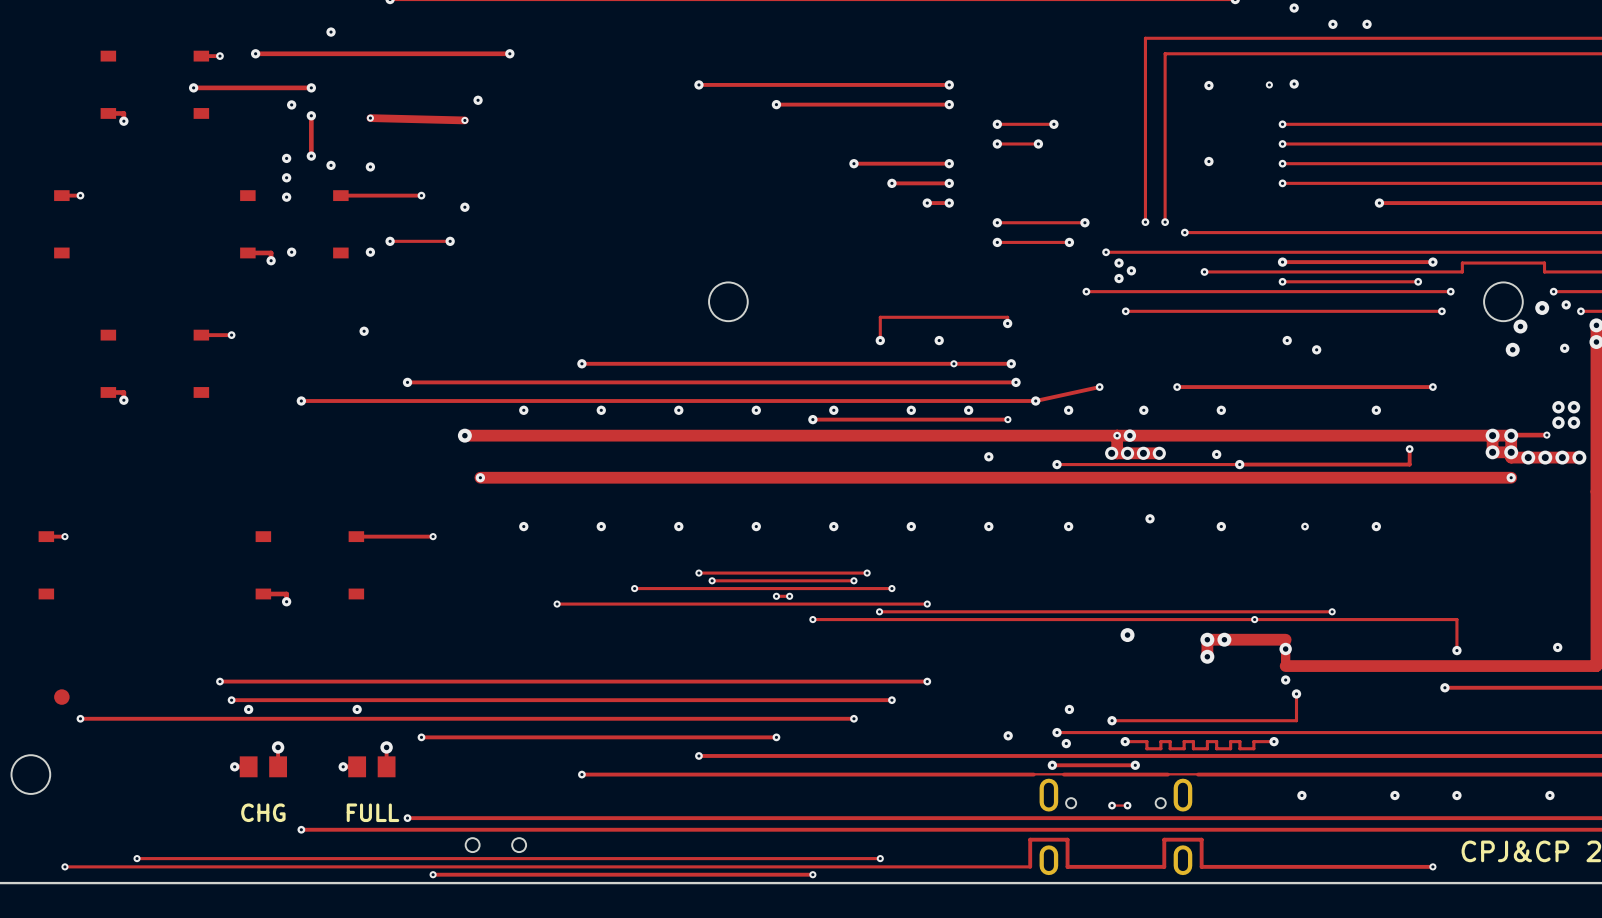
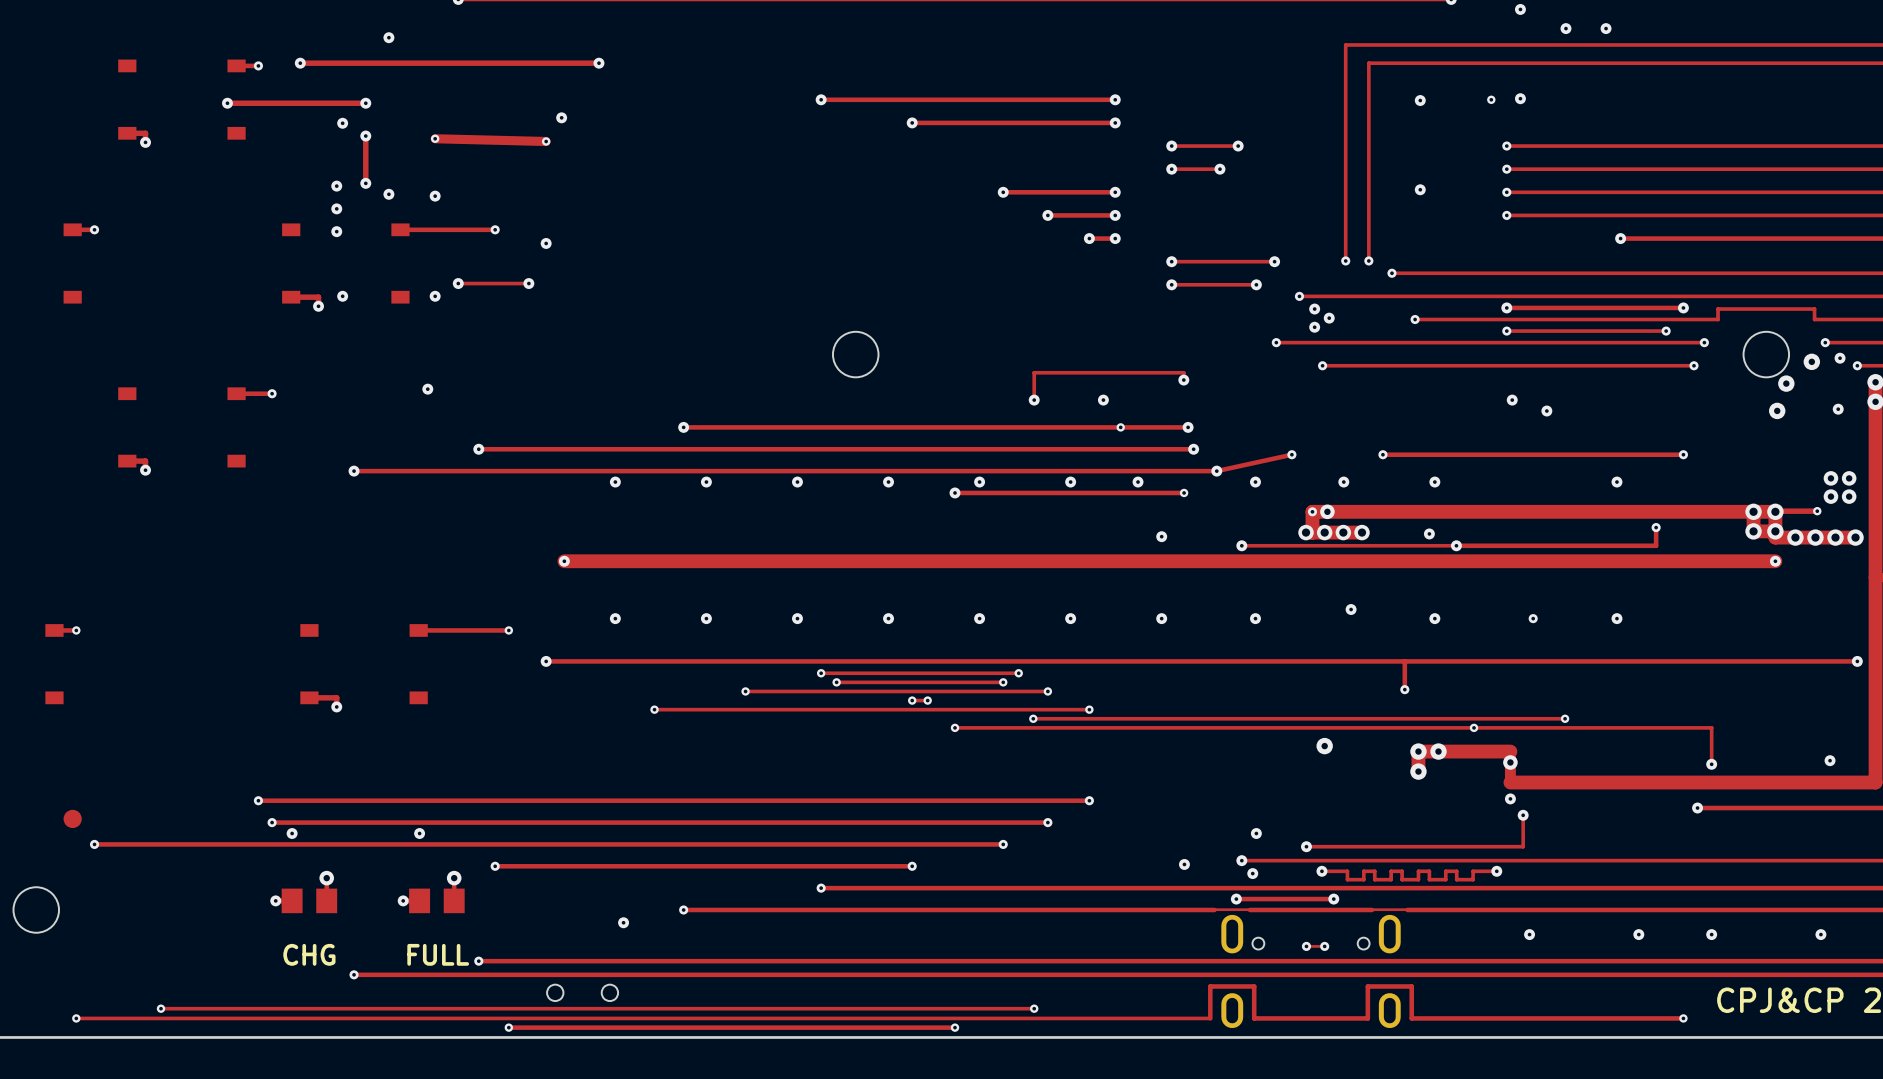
track: (464, 435) (1117, 435) -> none
via: (464, 435) -> none
track: none -> (546, 661) (1857, 661)
via: none -> (546, 661)
track: none -> (1404, 661) (1404, 689)
via: none -> (1857, 661)
via: none -> (1404, 689)
via: none -> (623, 922)

